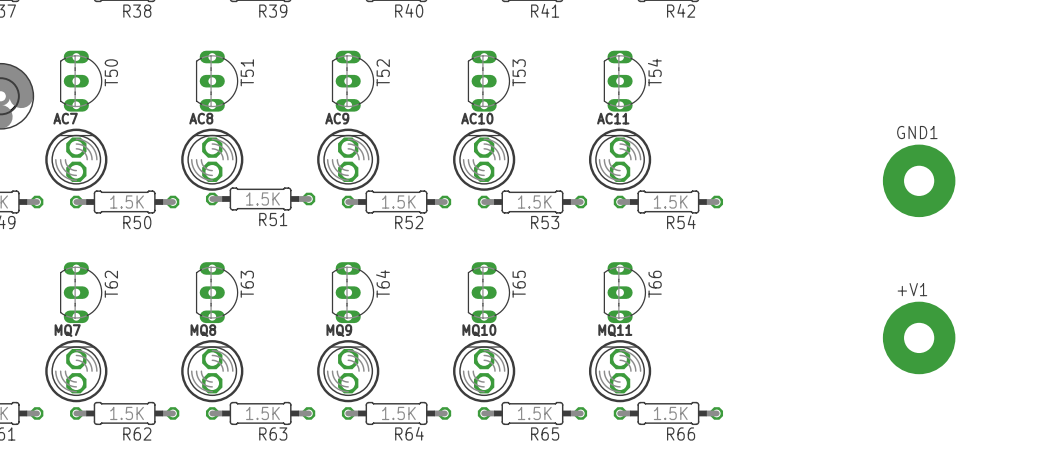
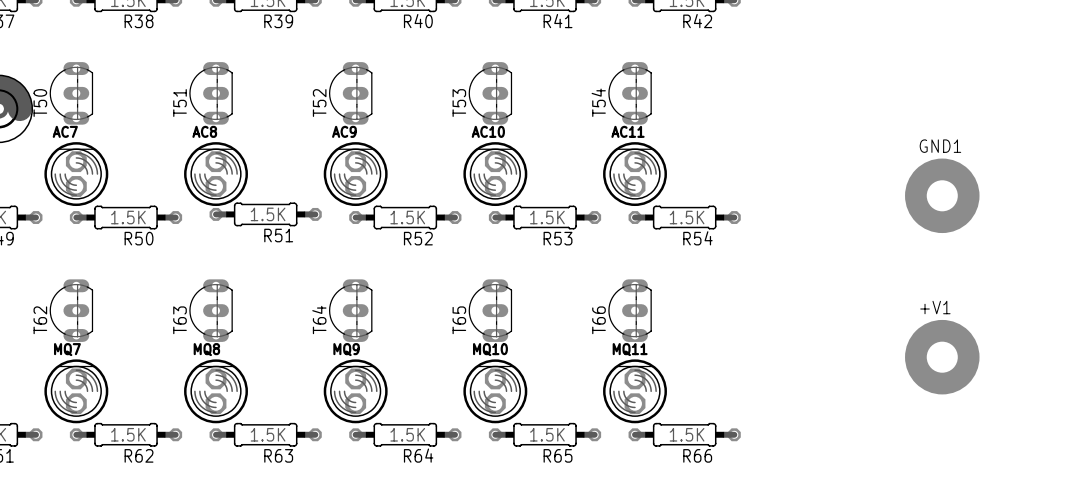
T50 rotation: 0° (81, 81) -> 180° (71, 93)
T51 rotation: 0° (217, 81) -> 180° (211, 93)
T52 rotation: 0° (353, 81) -> 180° (350, 93)
T53 rotation: 0° (488, 81) -> 180° (490, 93)
T54 rotation: 0° (624, 81) -> 180° (630, 93)
T62 rotation: 0° (81, 292) -> 180° (71, 310)
T63 rotation: 0° (217, 292) -> 180° (211, 310)
T64 rotation: 0° (353, 292) -> 180° (350, 310)
T65 rotation: 0° (488, 292) -> 180° (490, 310)
T66 rotation: 0° (624, 292) -> 180° (630, 310)

